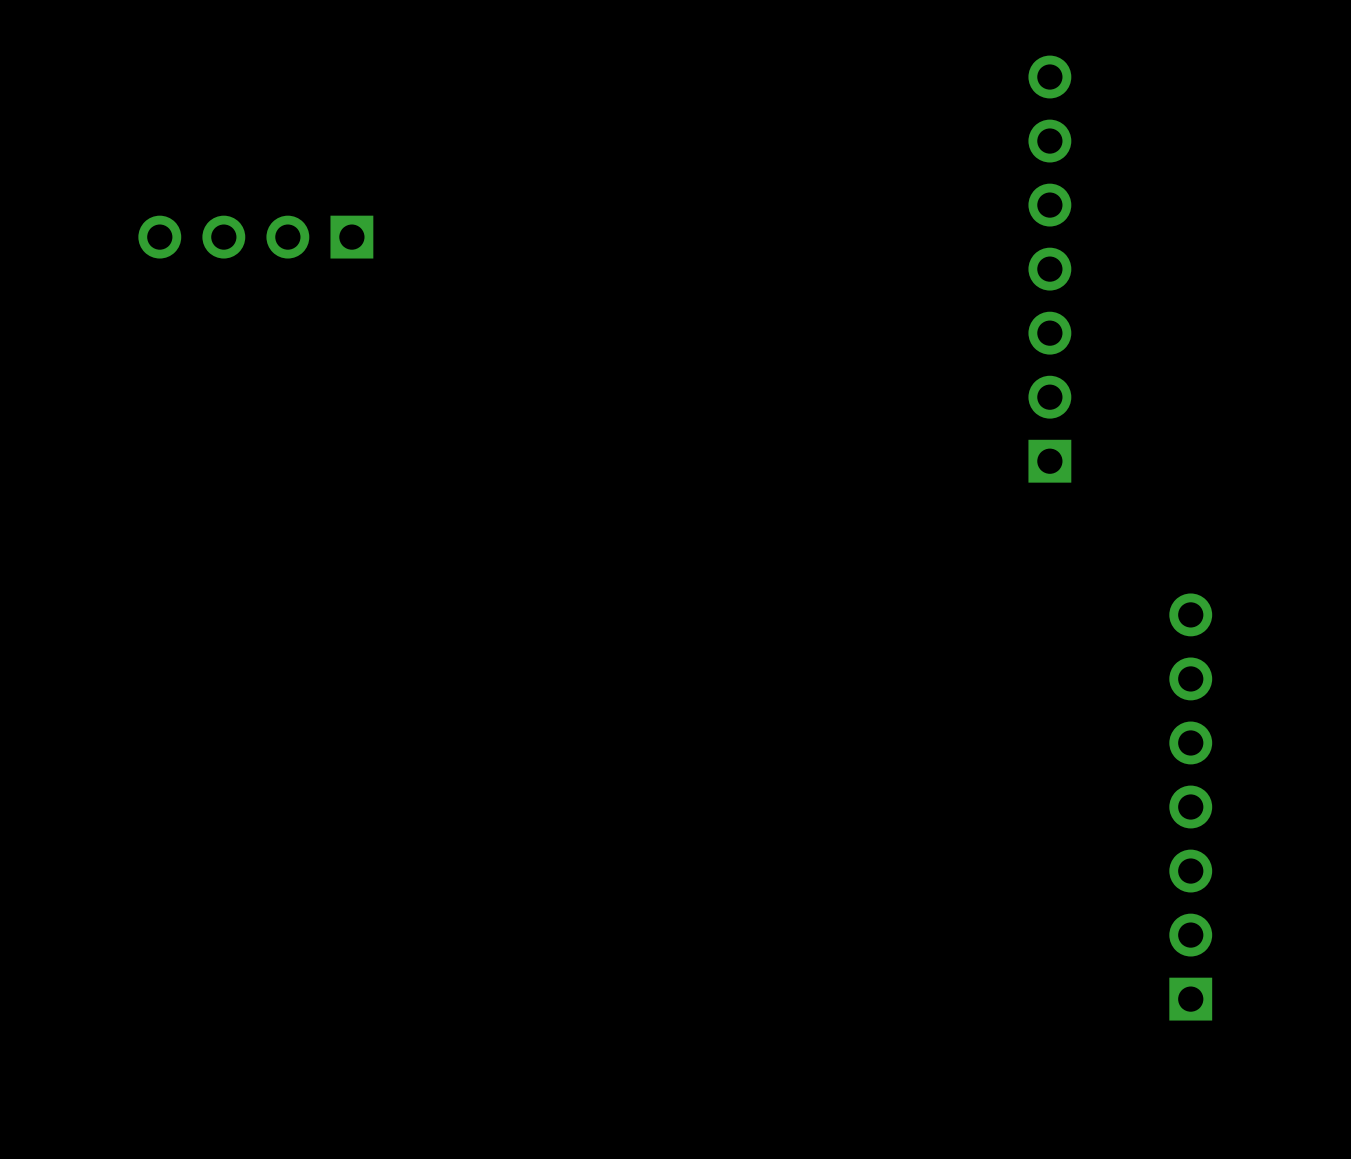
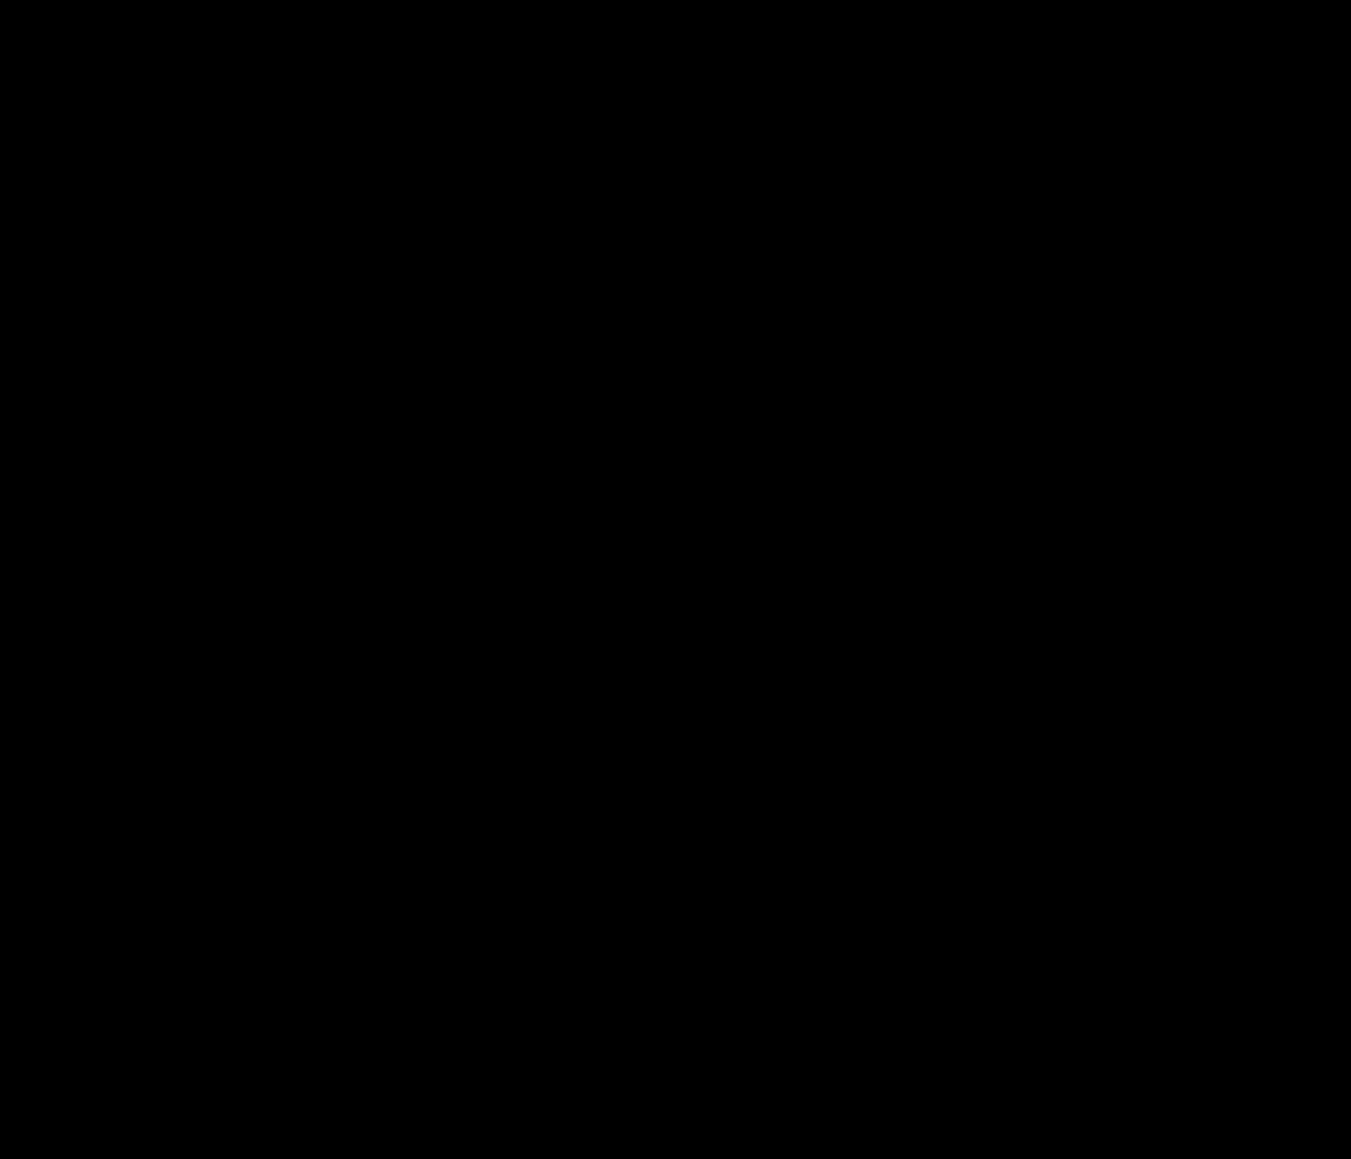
part: (255, 237) -> none
part: (1049, 269) -> none
part: (1190, 807) -> none

